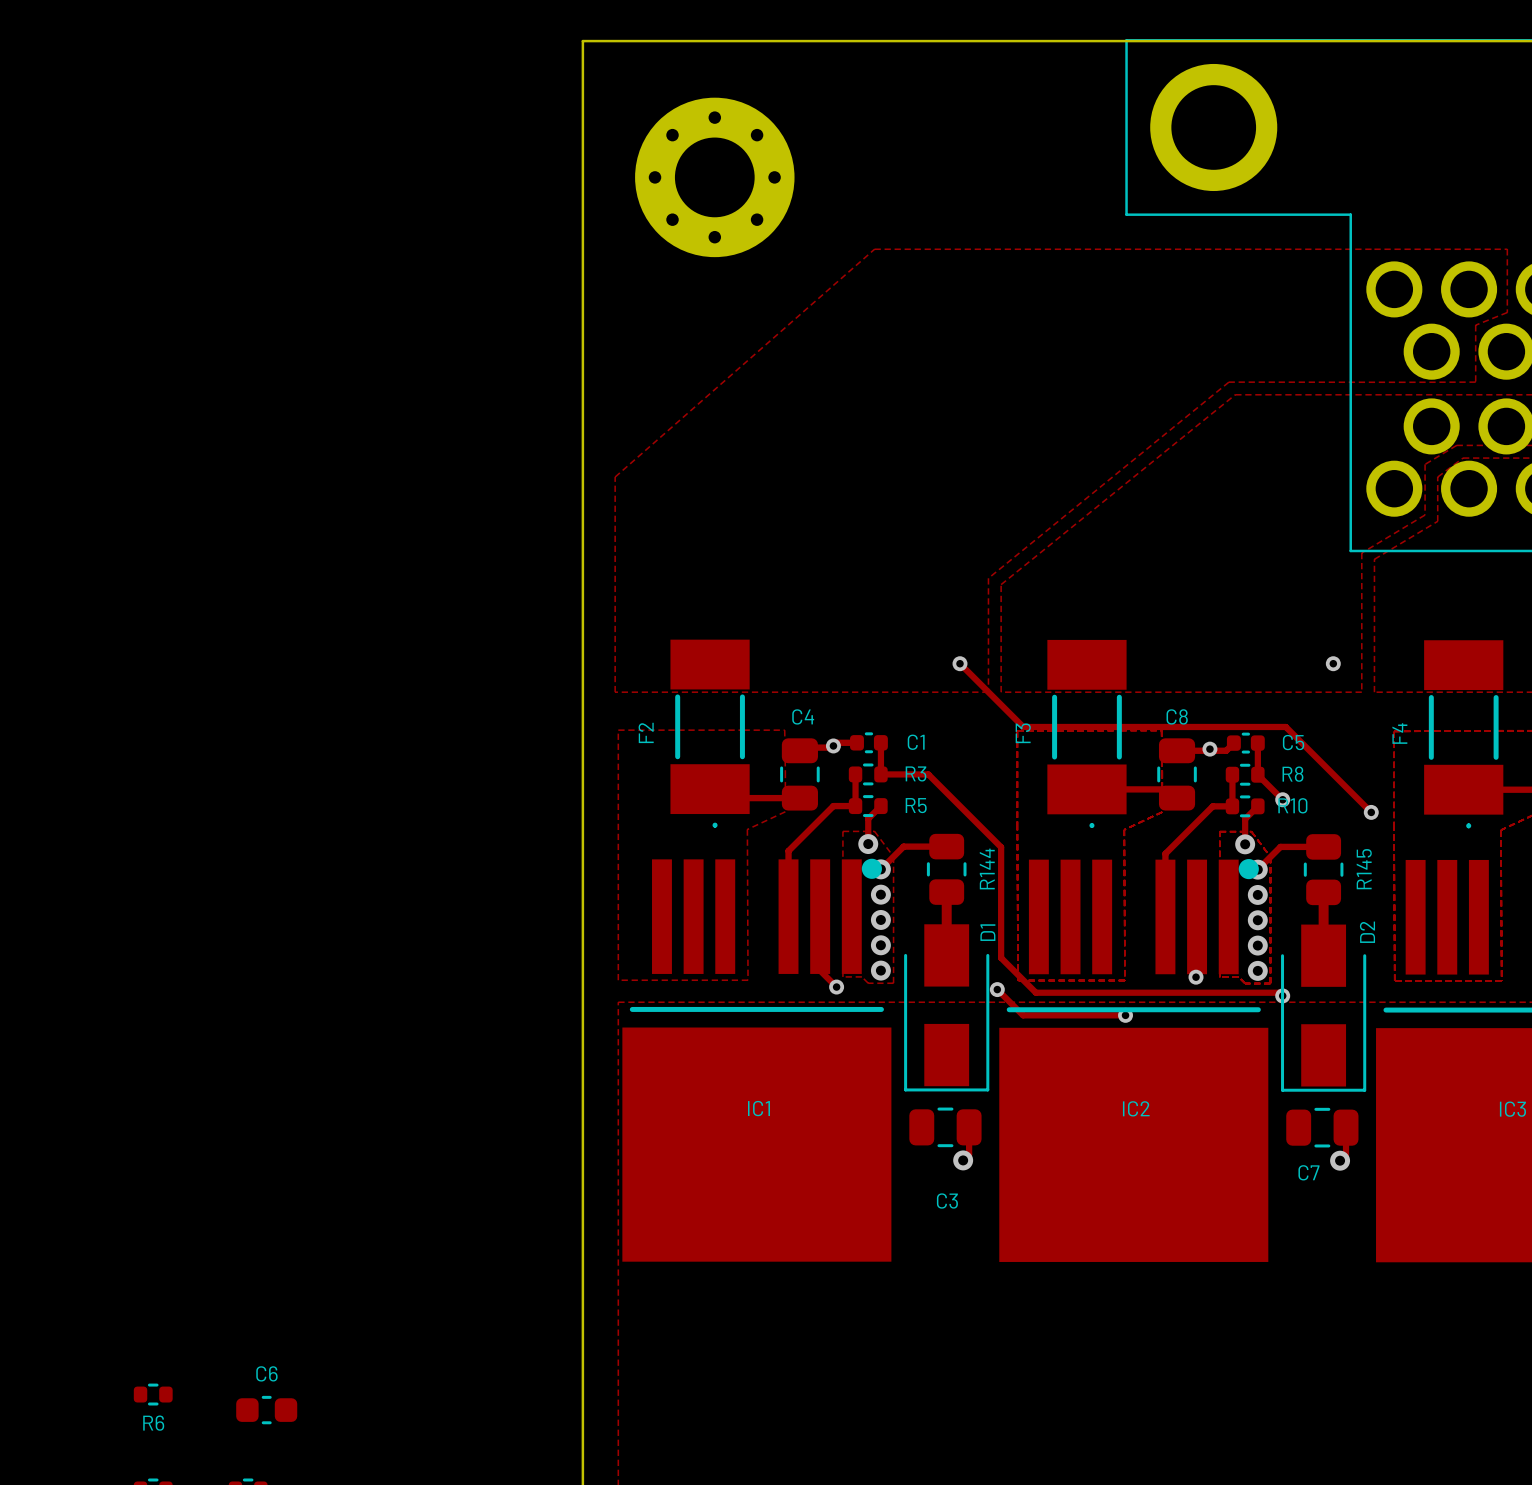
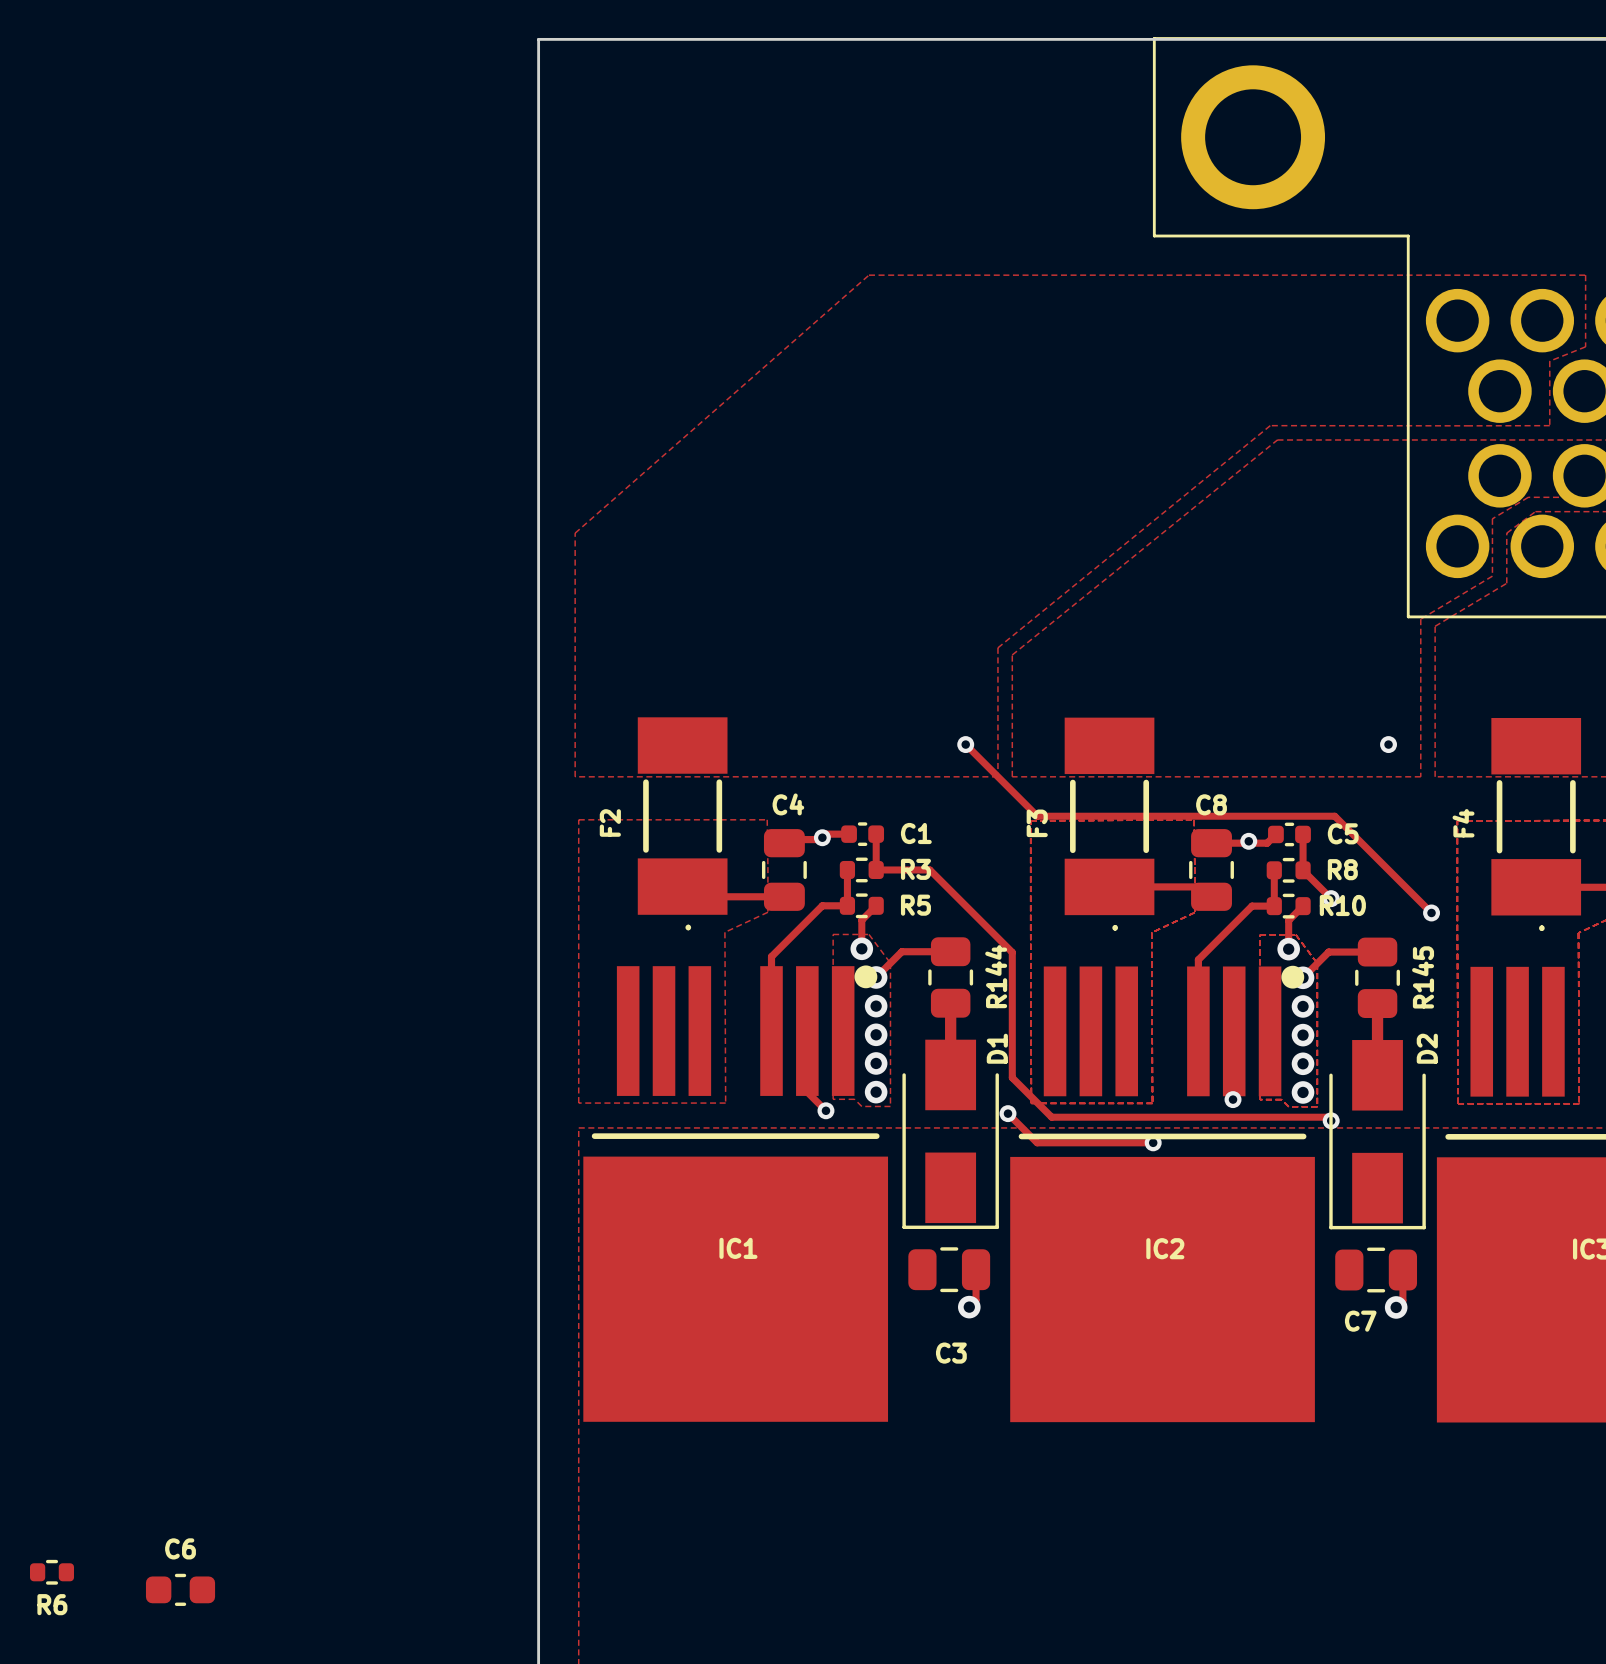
part: (714, 177) -> none

